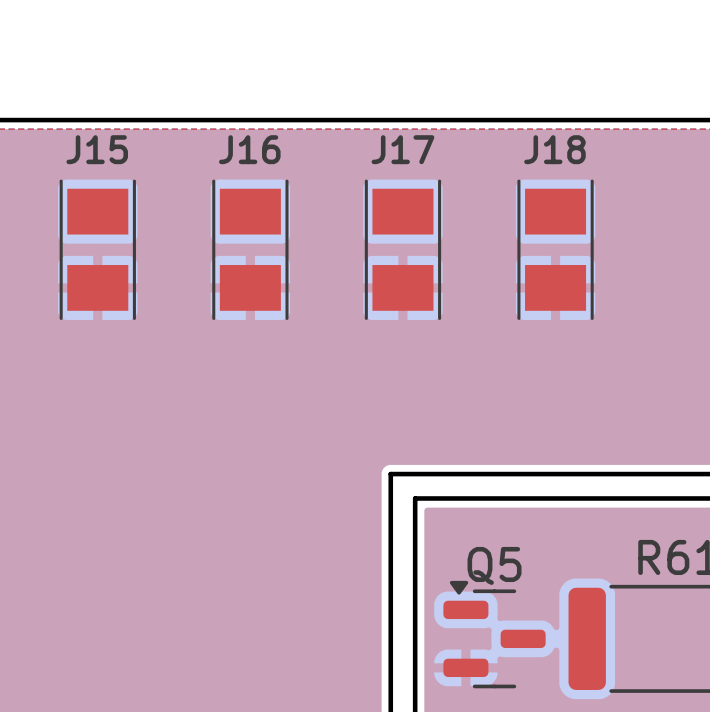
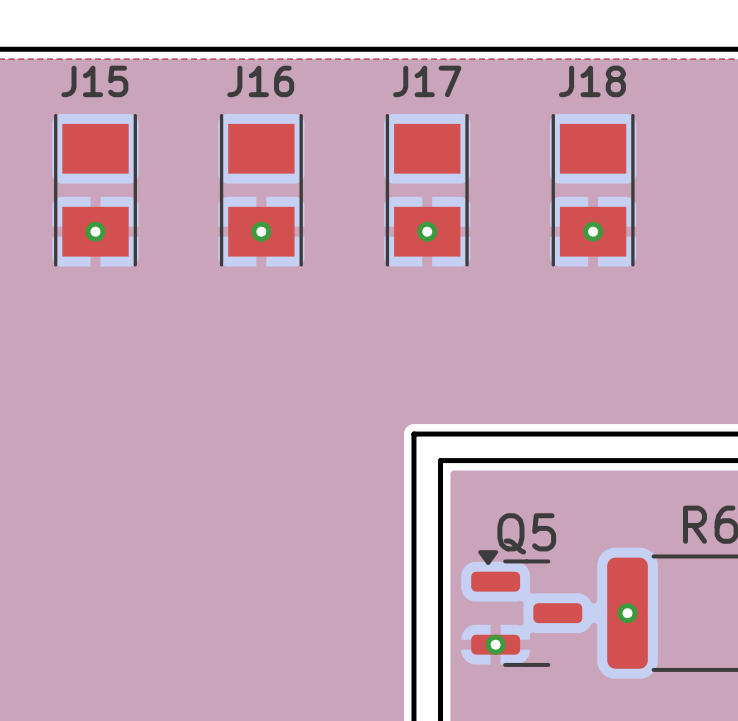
via: none -> (95, 231)
via: none -> (261, 231)
via: none -> (427, 231)
via: none -> (593, 231)
via: none -> (627, 613)
via: none -> (495, 644)

